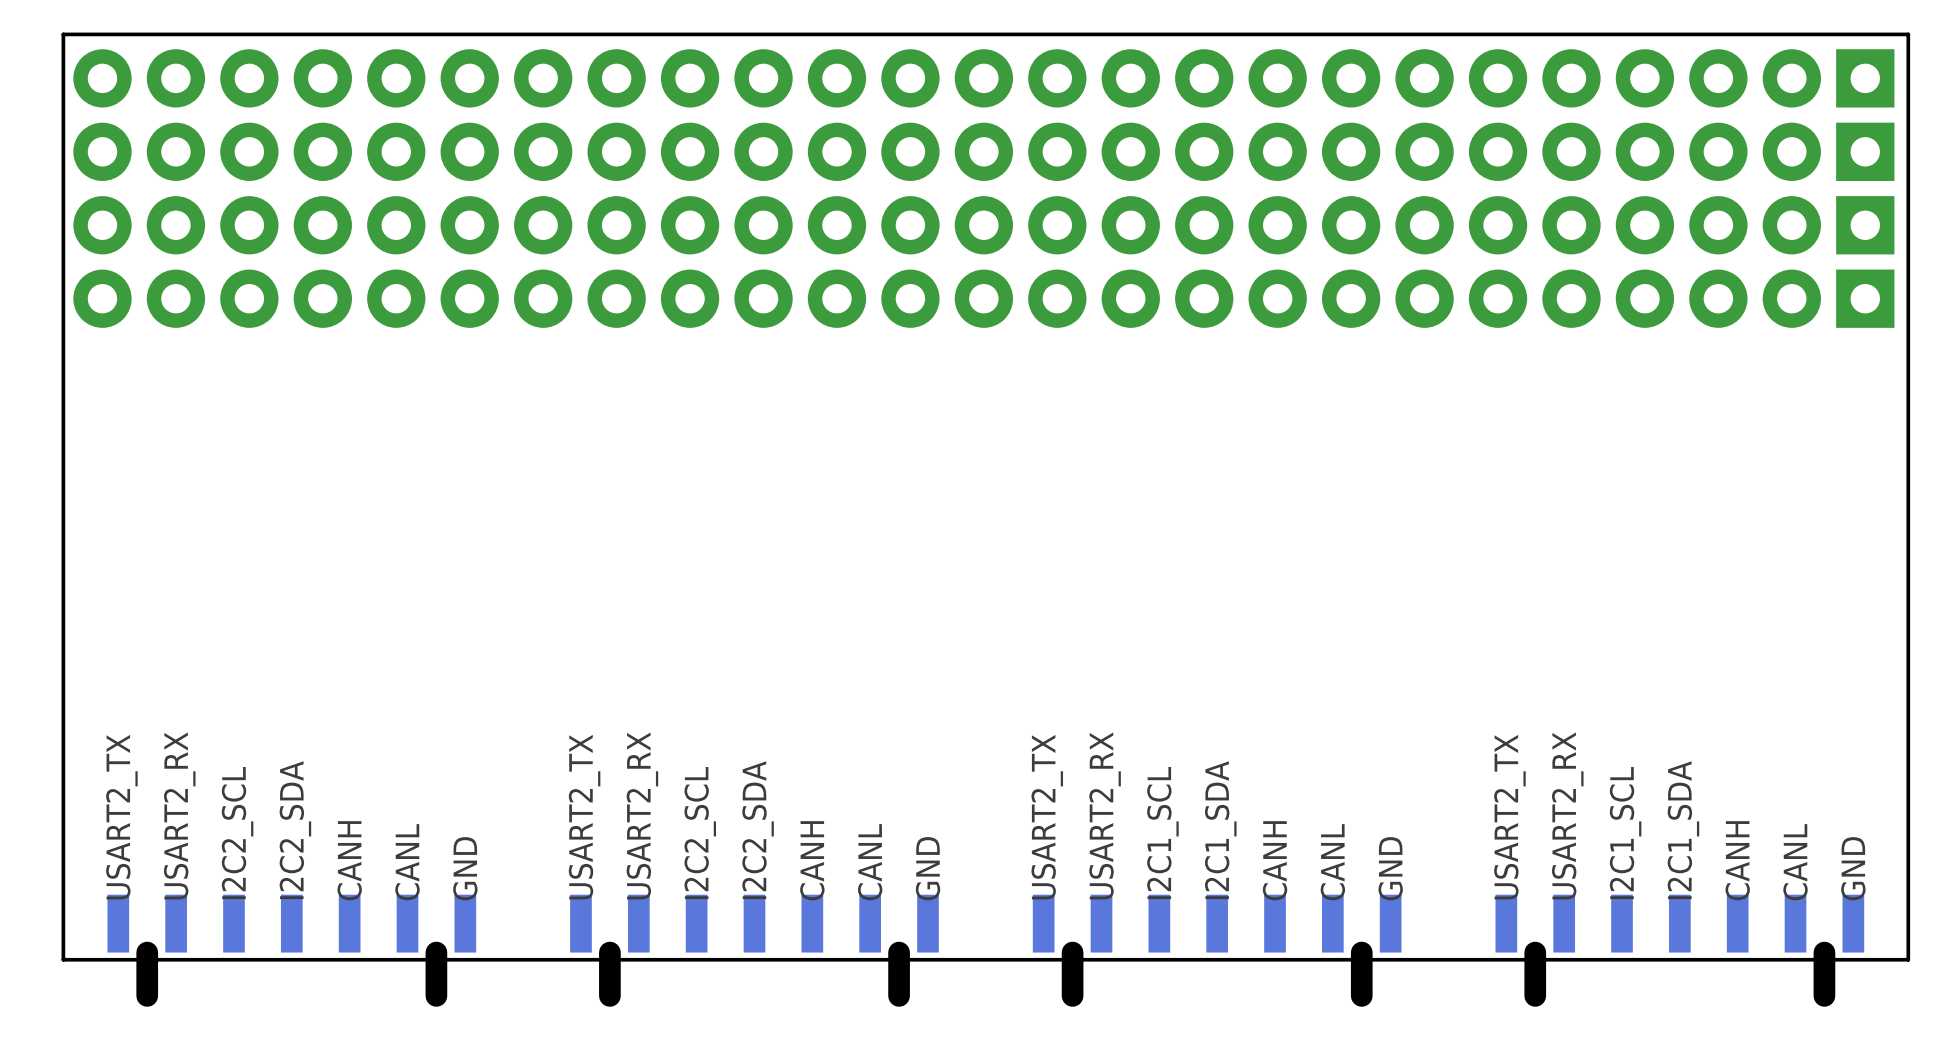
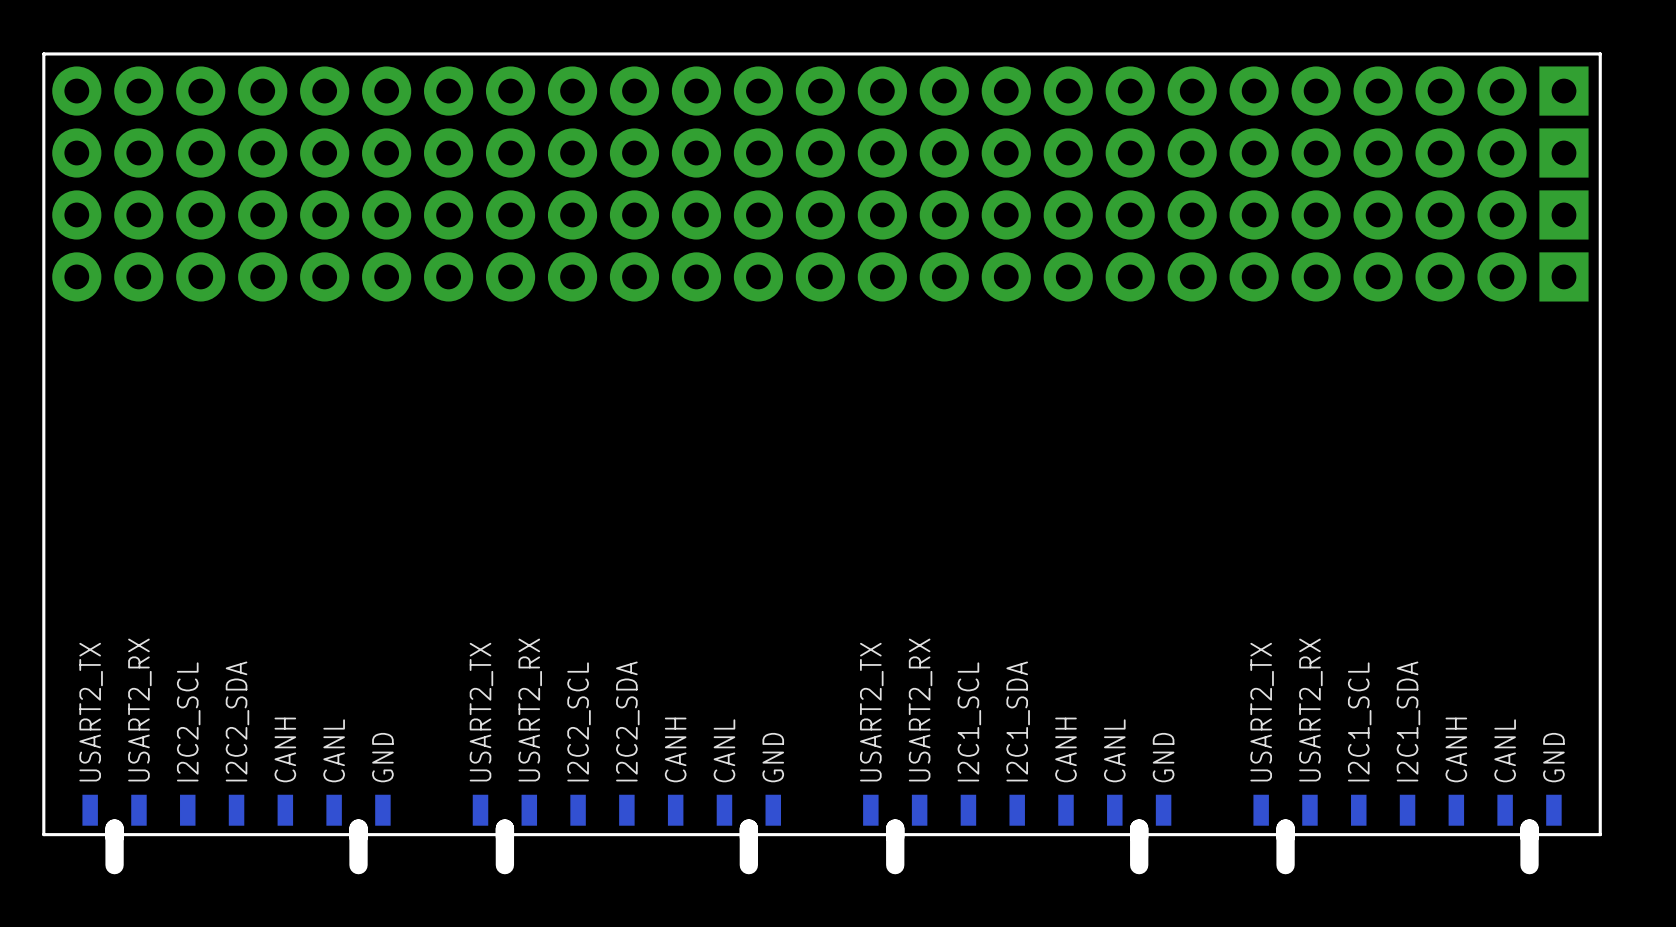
part footprint: [107, 894, 477, 953] -> [82, 794, 391, 847]
part footprint: [570, 894, 939, 953] -> [472, 794, 781, 847]
part footprint: [1032, 894, 1402, 953] -> [863, 794, 1172, 847]
part footprint: [1495, 894, 1865, 953] -> [1253, 794, 1562, 847]

